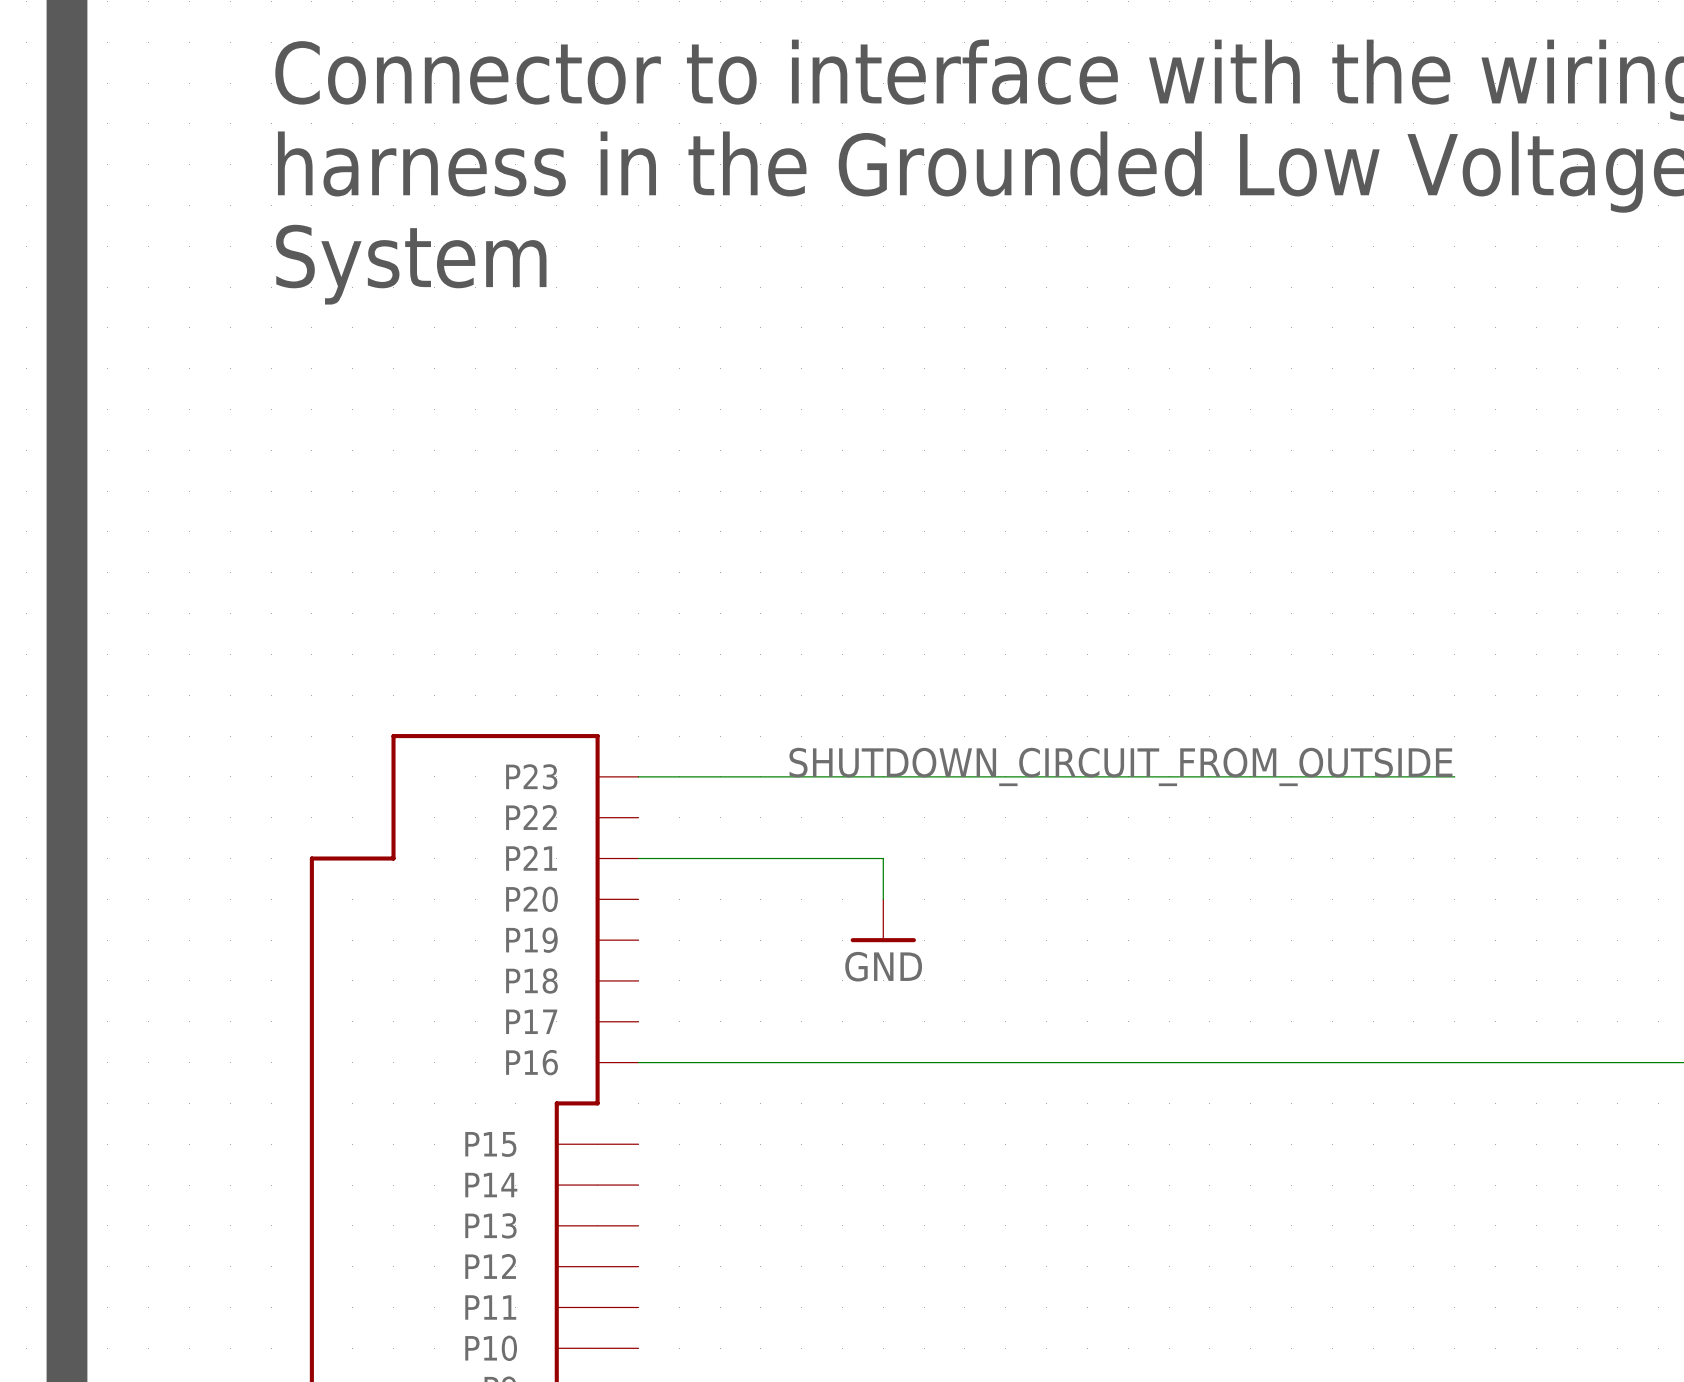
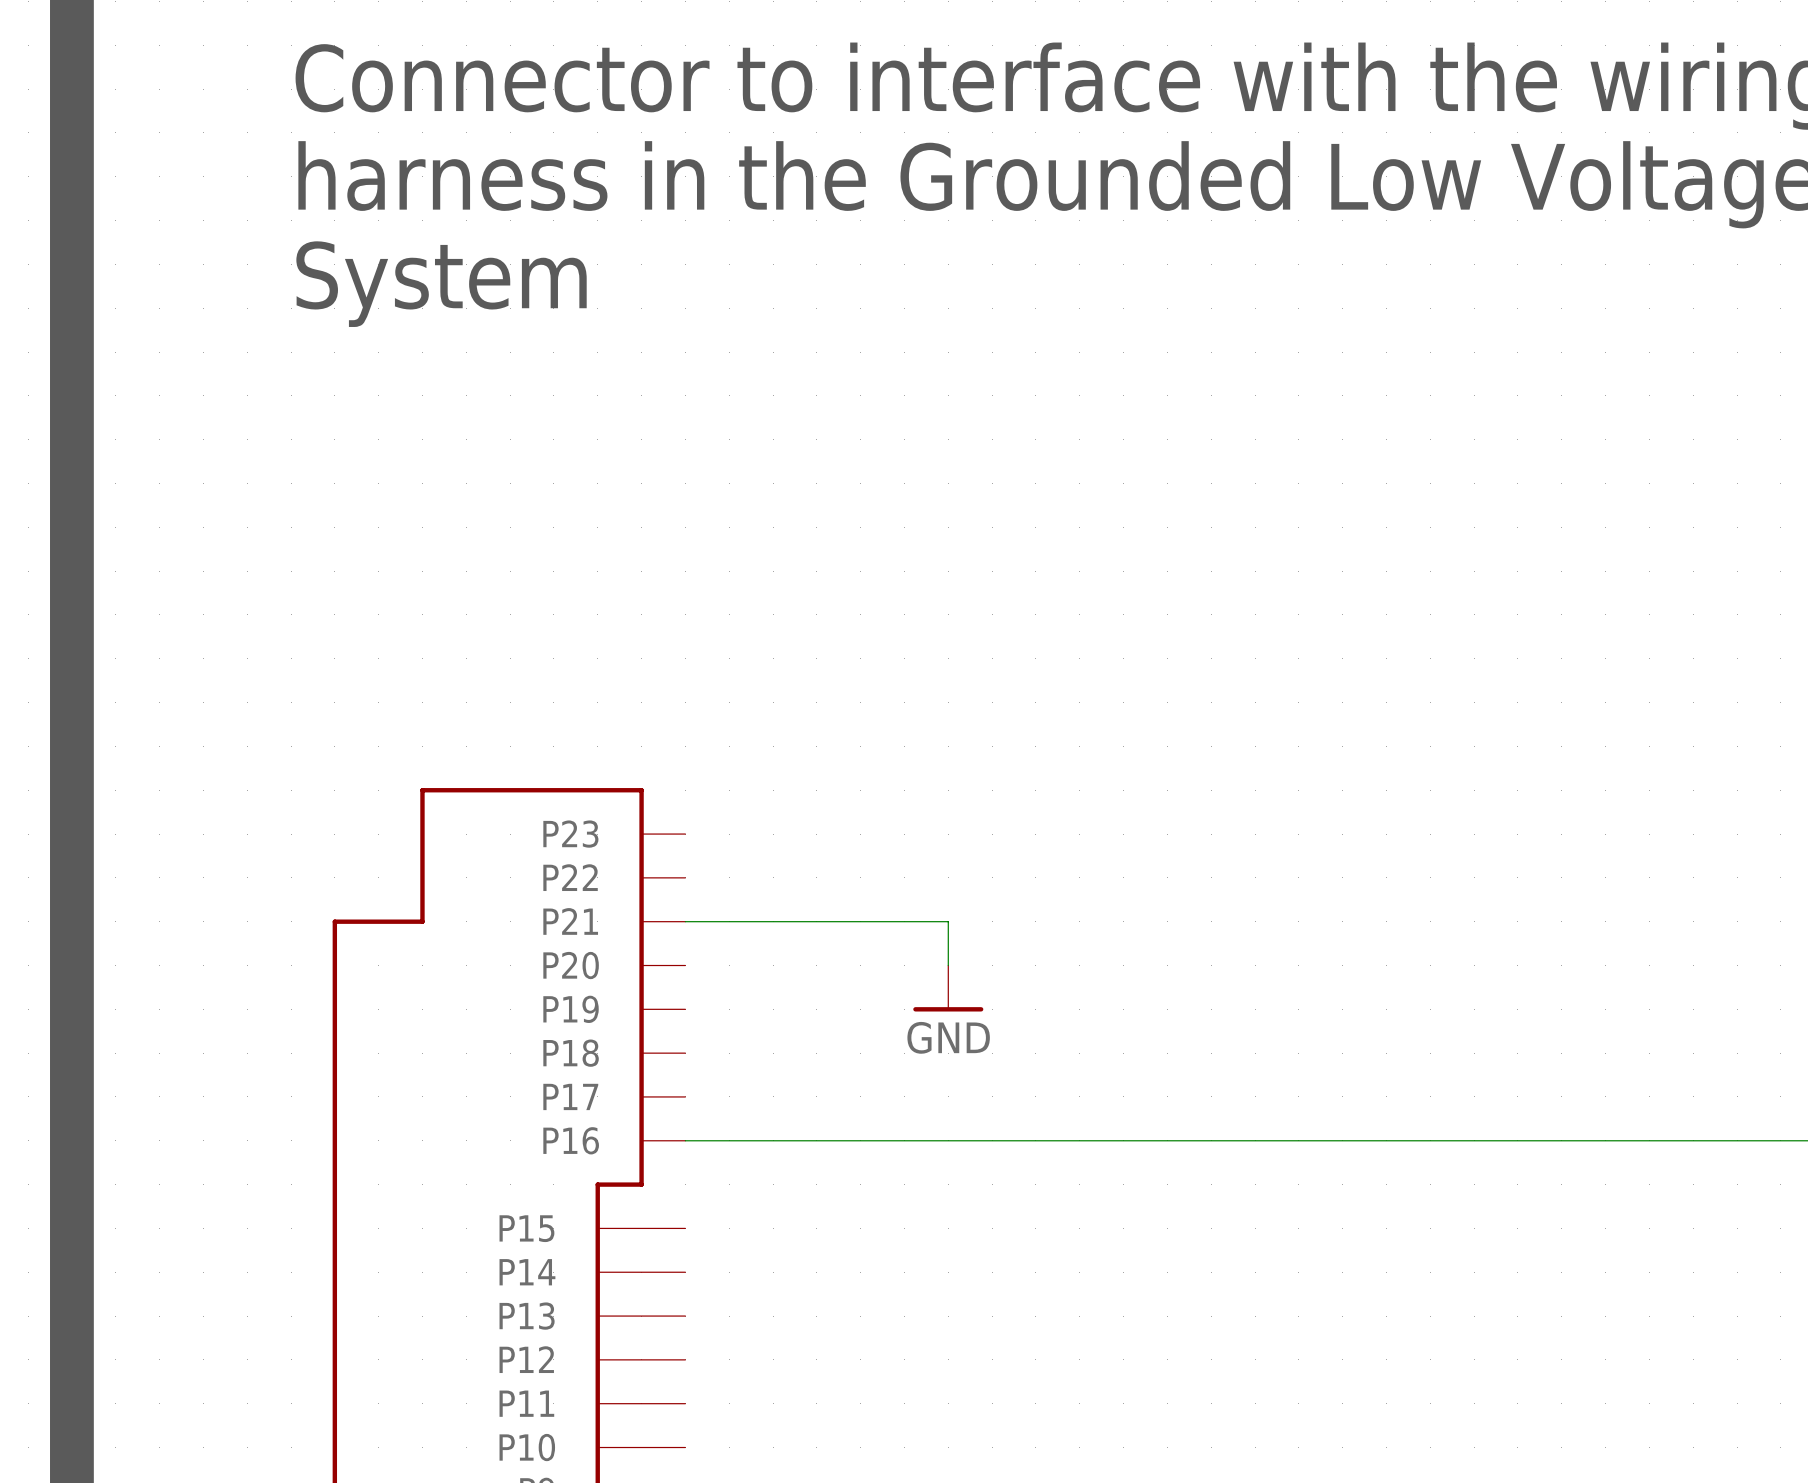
label: SHUTDOWN_CIRCUIT_FROM_OUTSIDE (1120, 766) -> none
wire: (638, 776) (1454, 776) -> none

